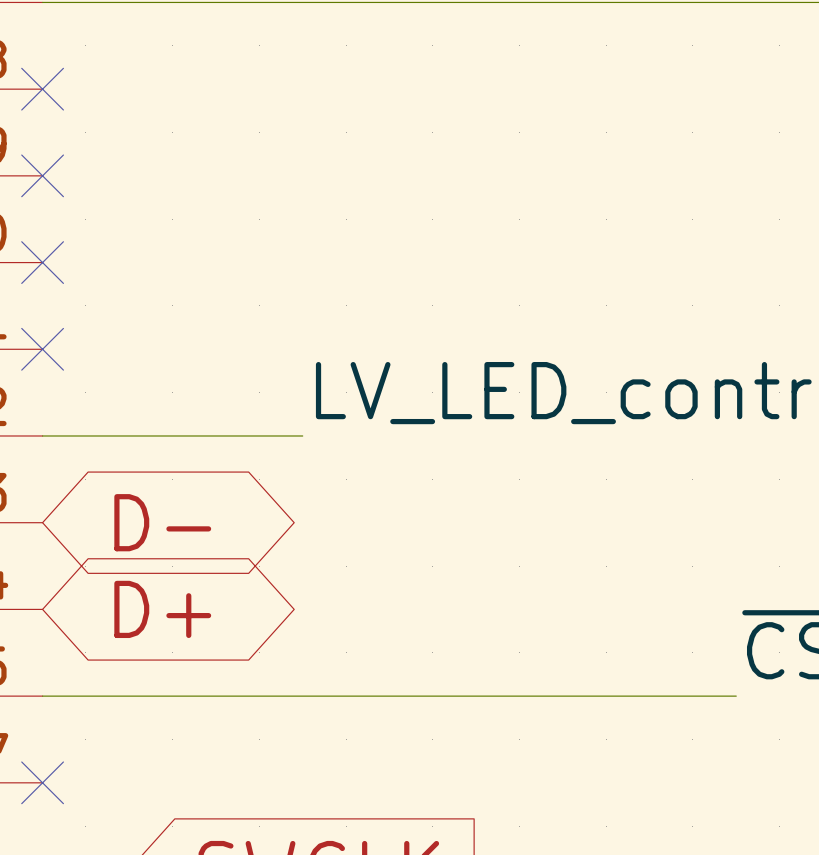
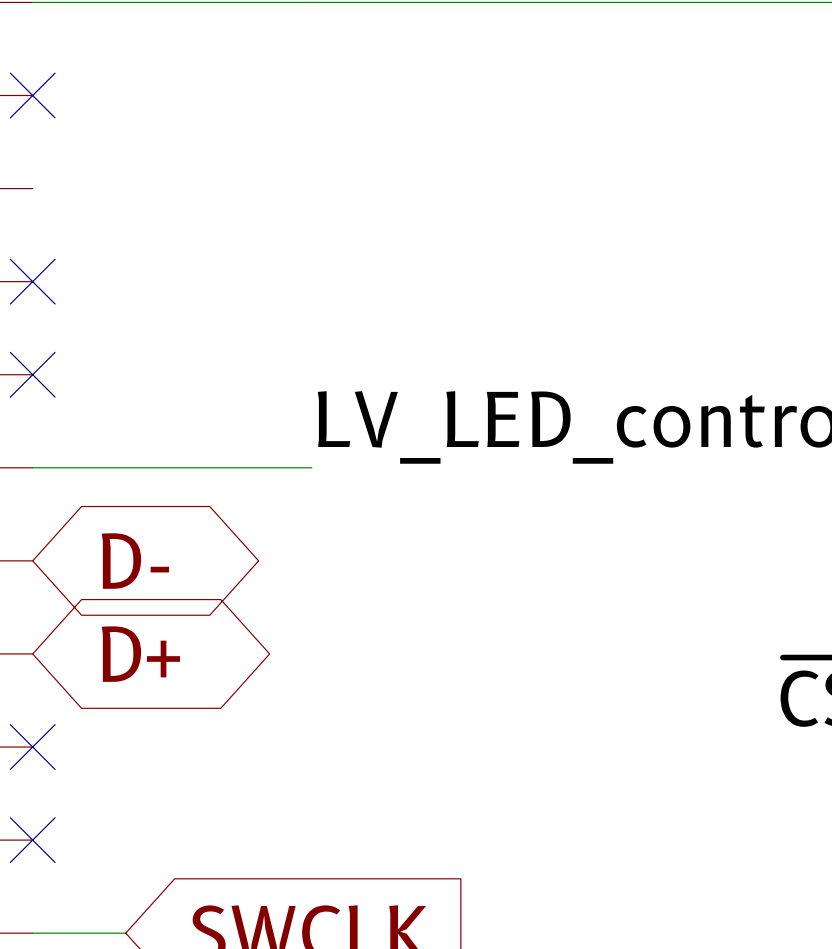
no-connect mark: (42, 175) -> none
wire: (42, 696) (736, 696) -> none
no-connect mark: none -> (32, 747)

